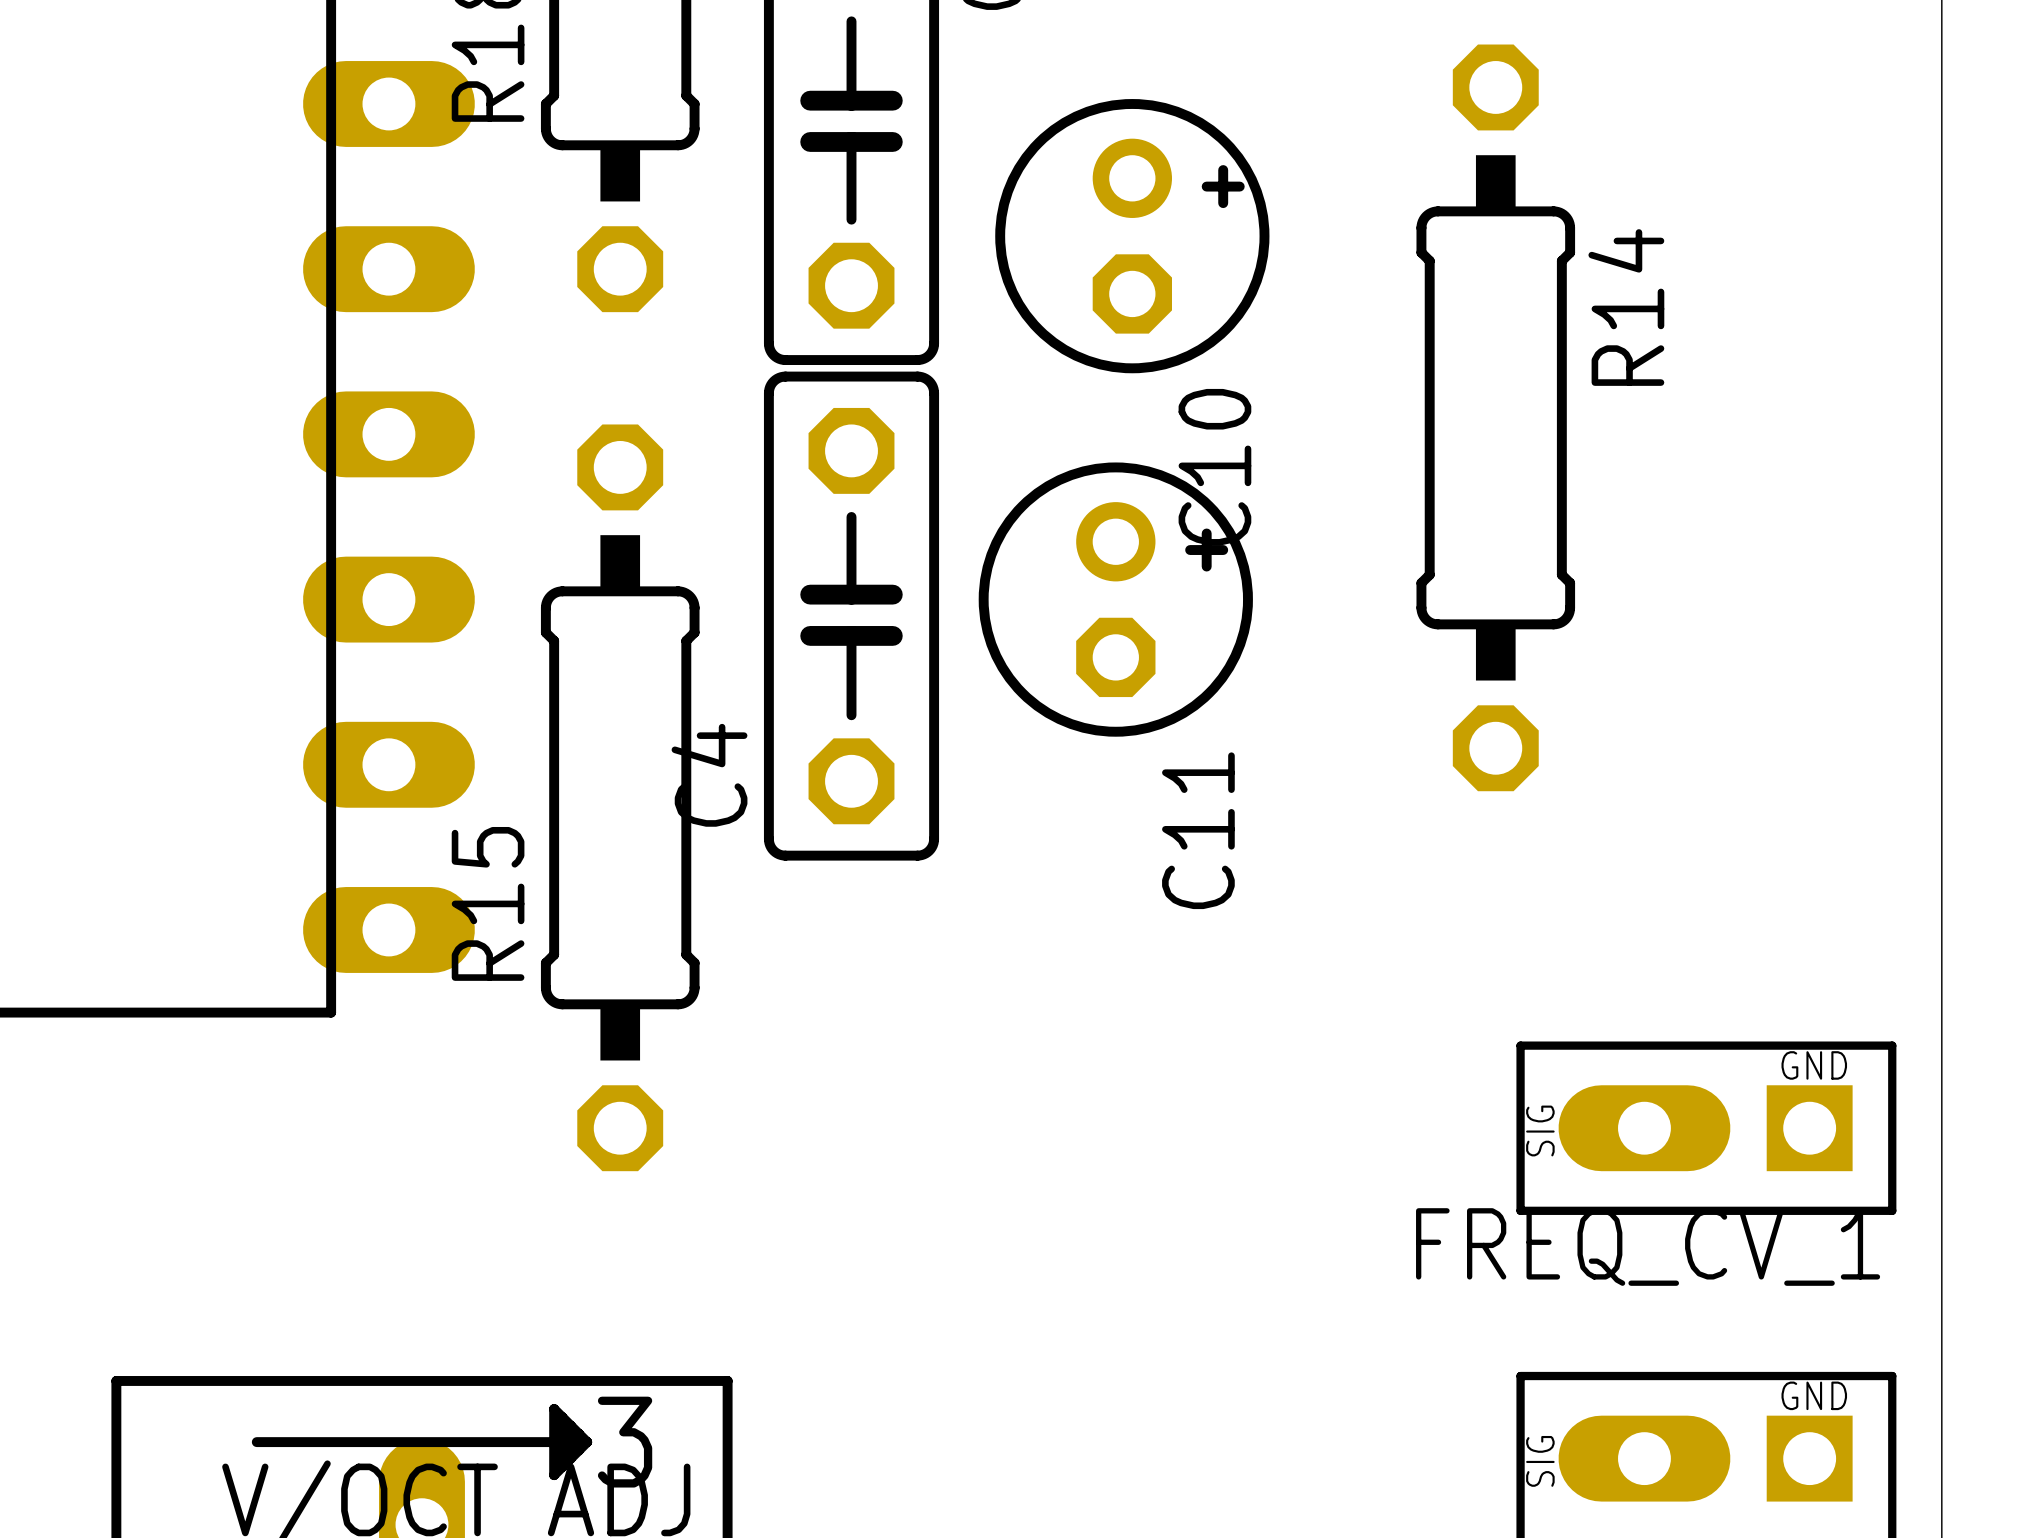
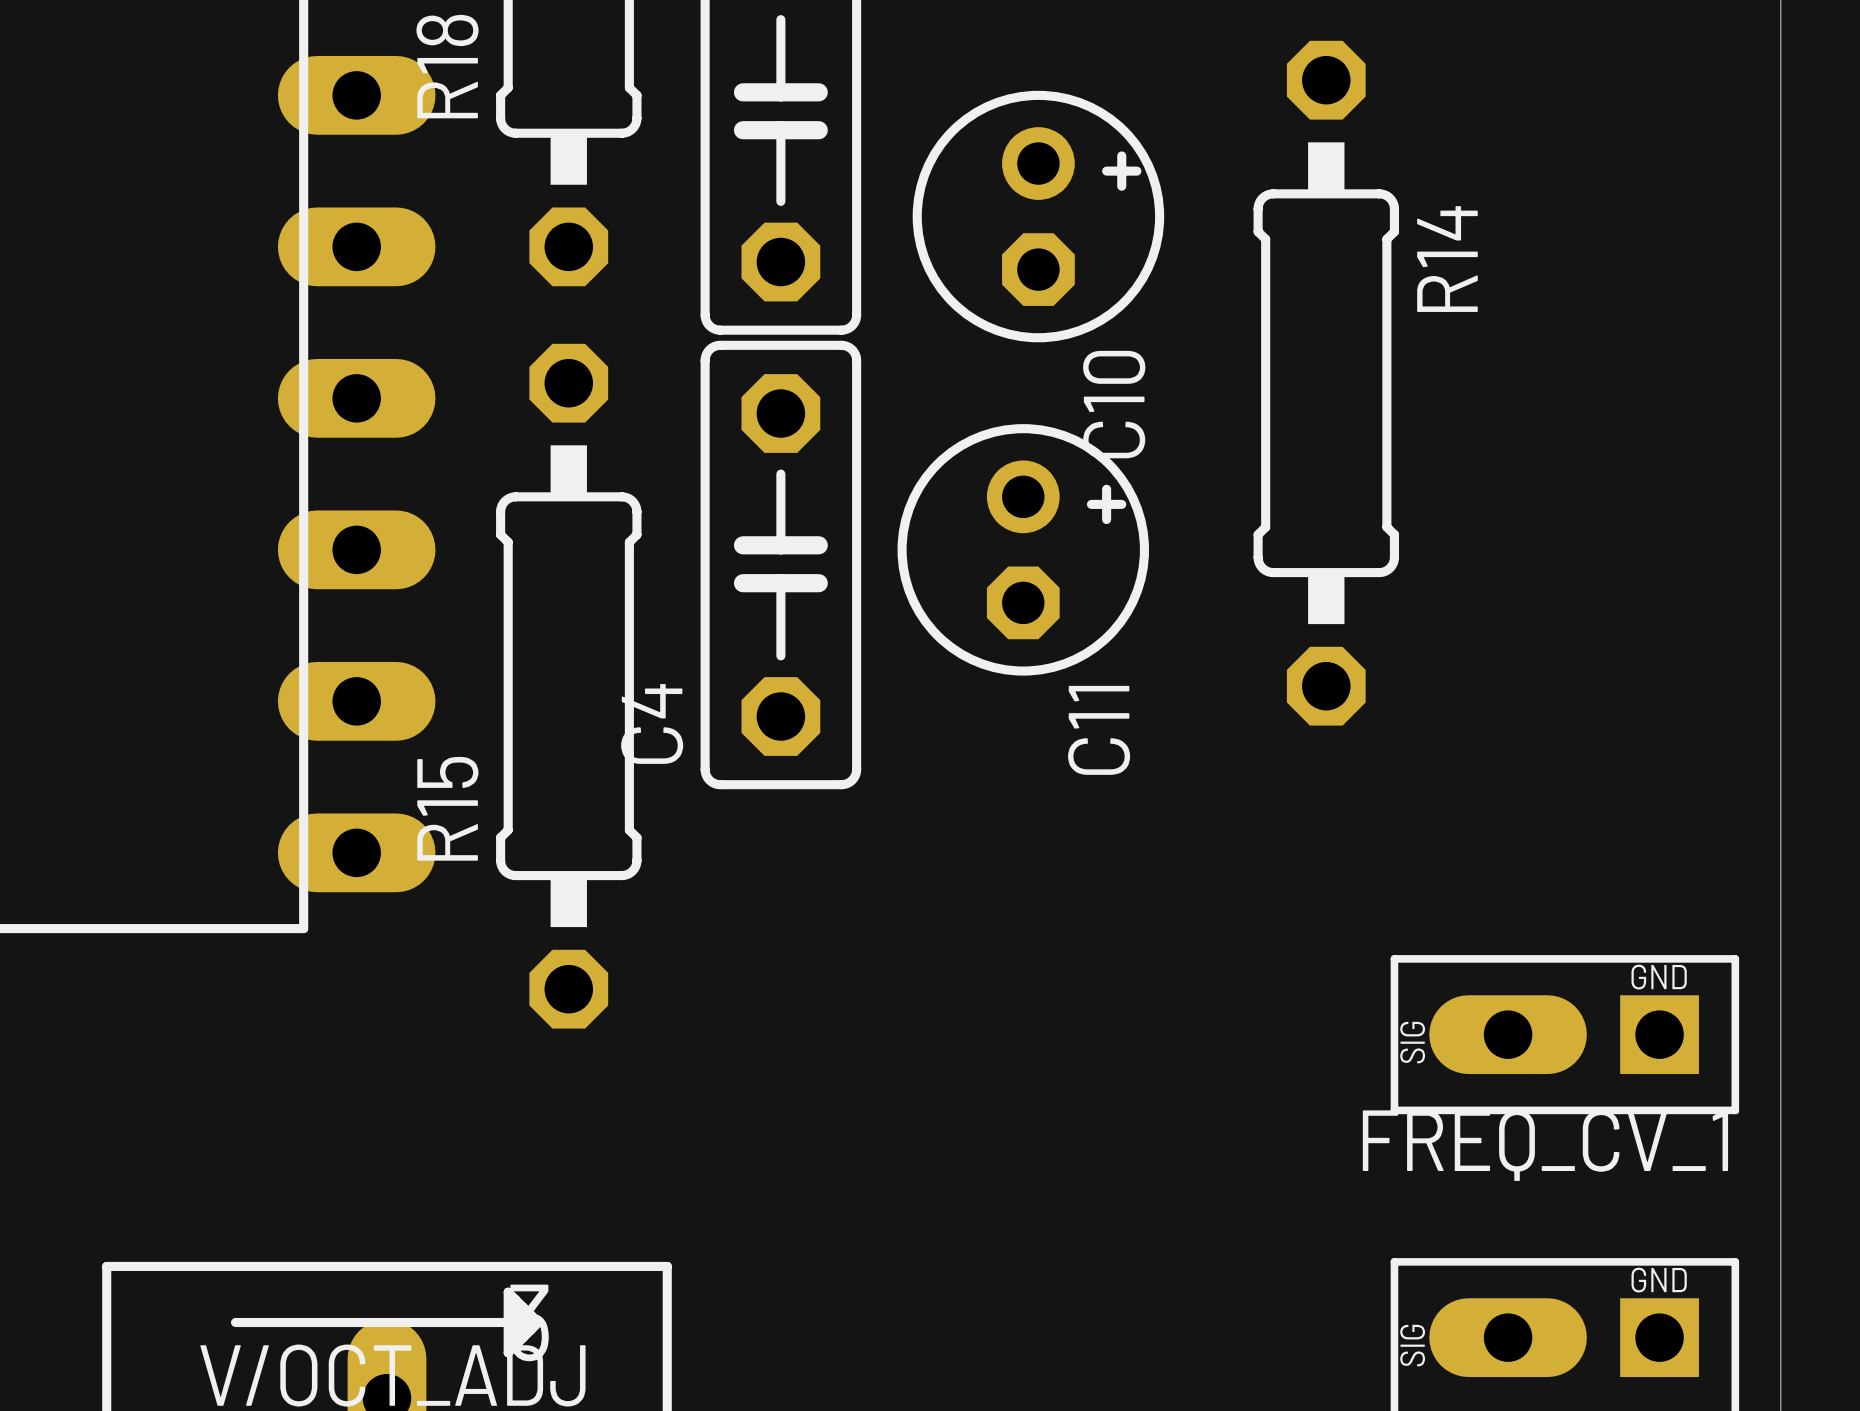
R14 position: (1495, 417) -> (1326, 383)
R15 position: (620, 797) -> (568, 686)

